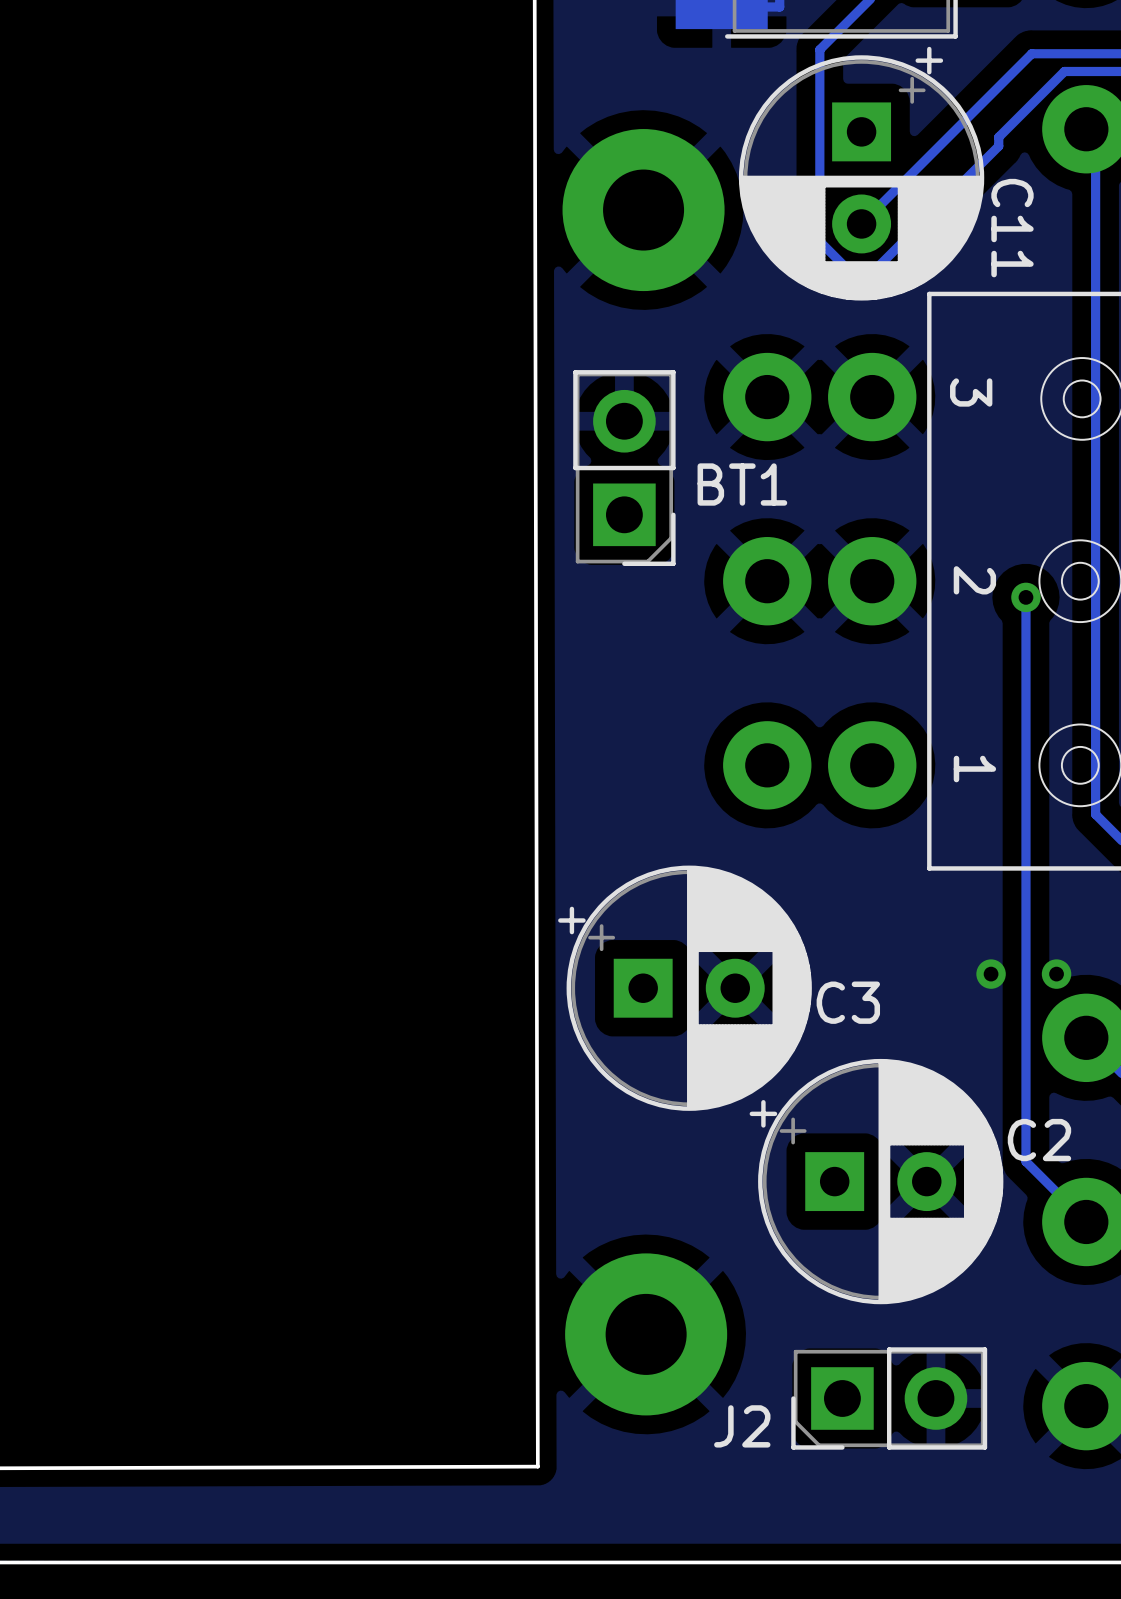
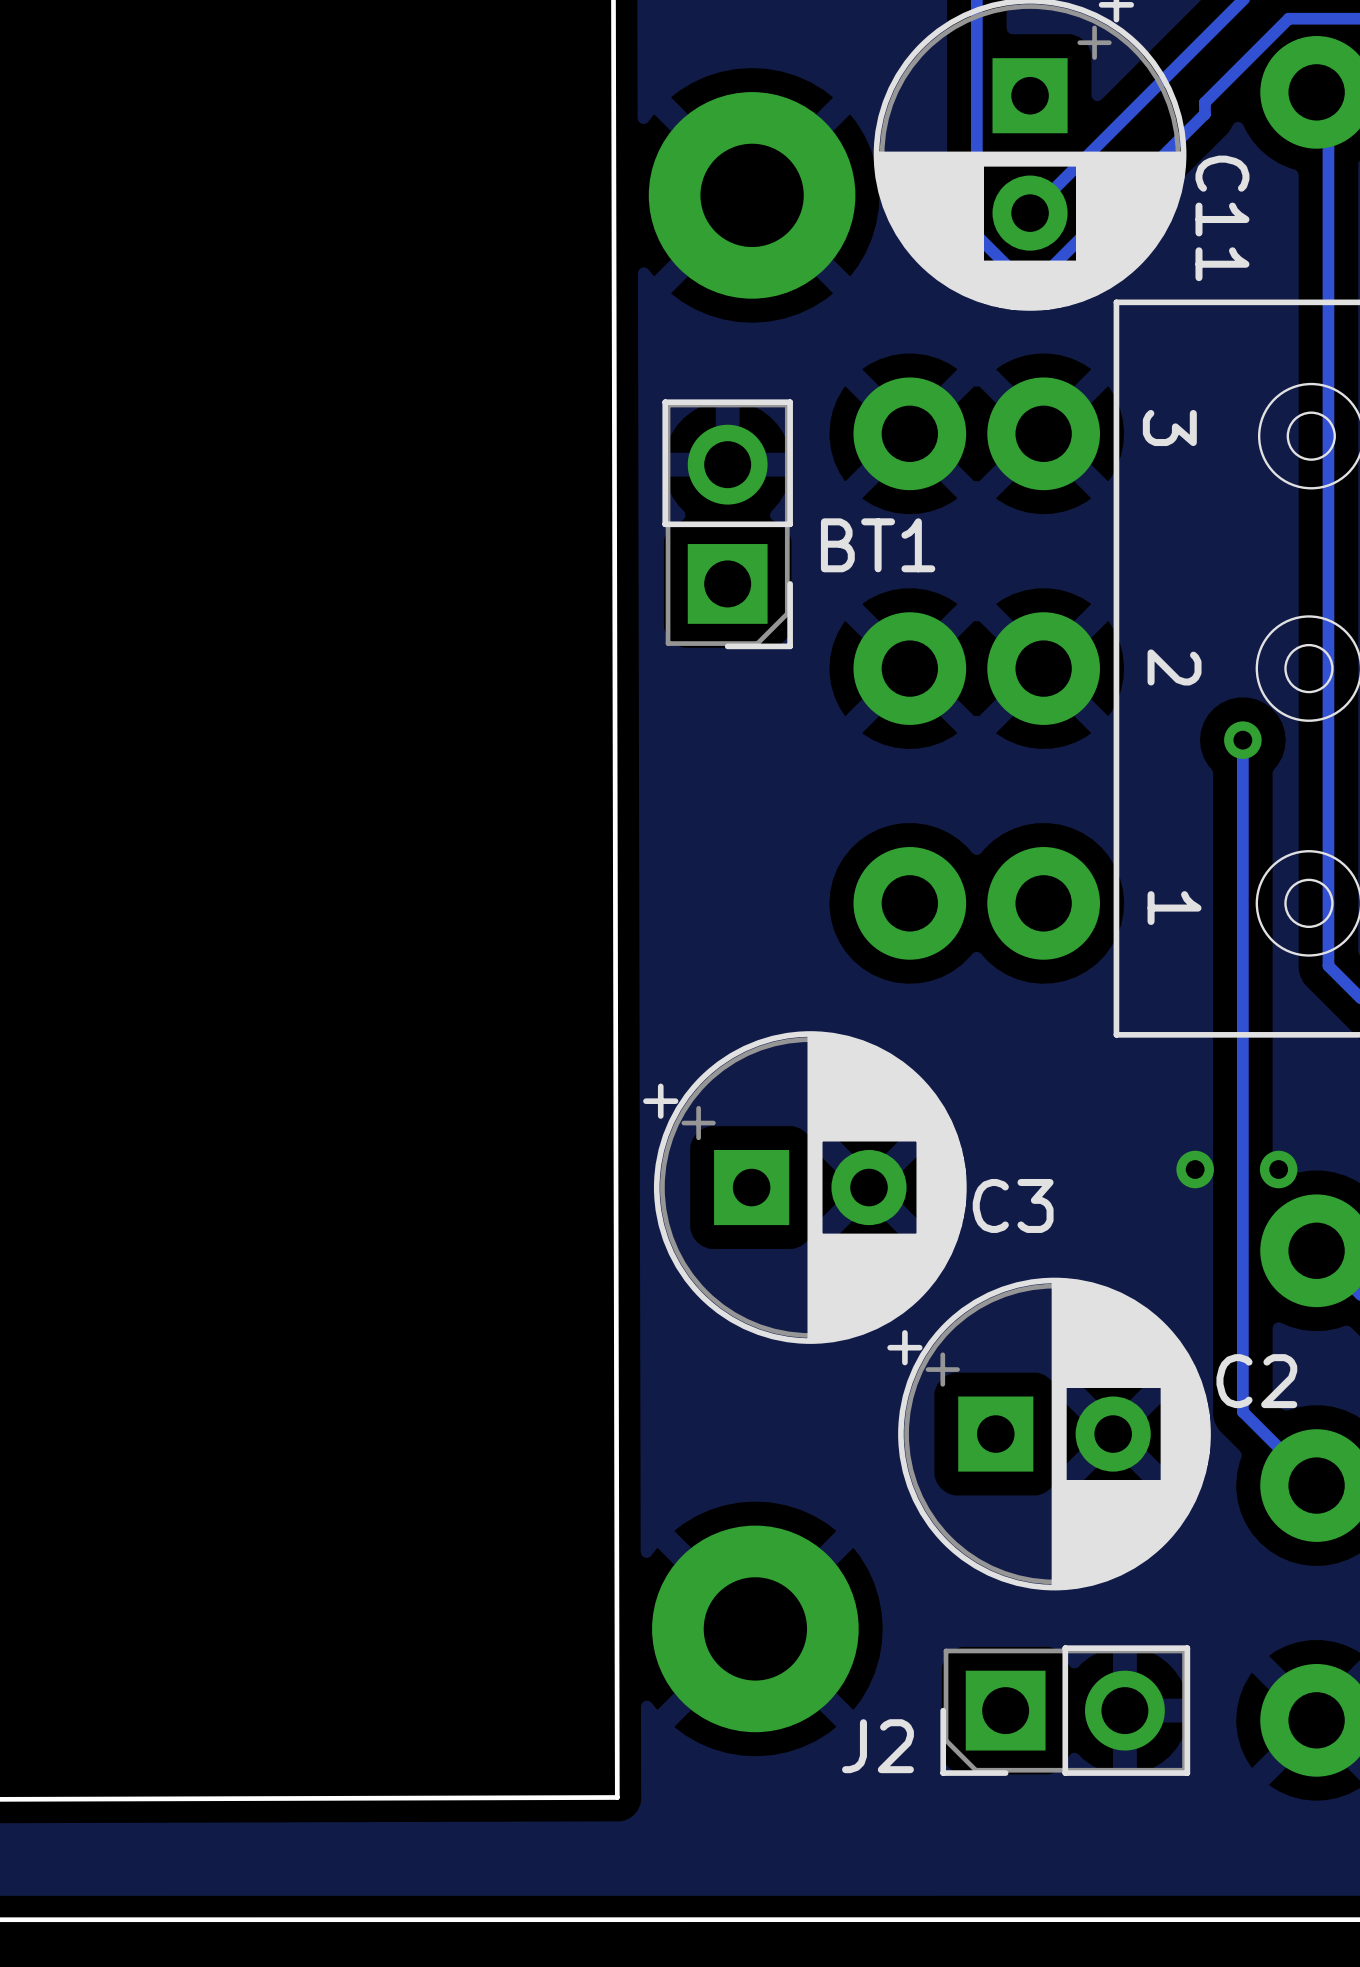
track: (1025, 597) (1025, 1161) (1028, 1164) -> (1242, 740) (1242, 1411)
via position: (1025, 597) -> (1242, 740)

